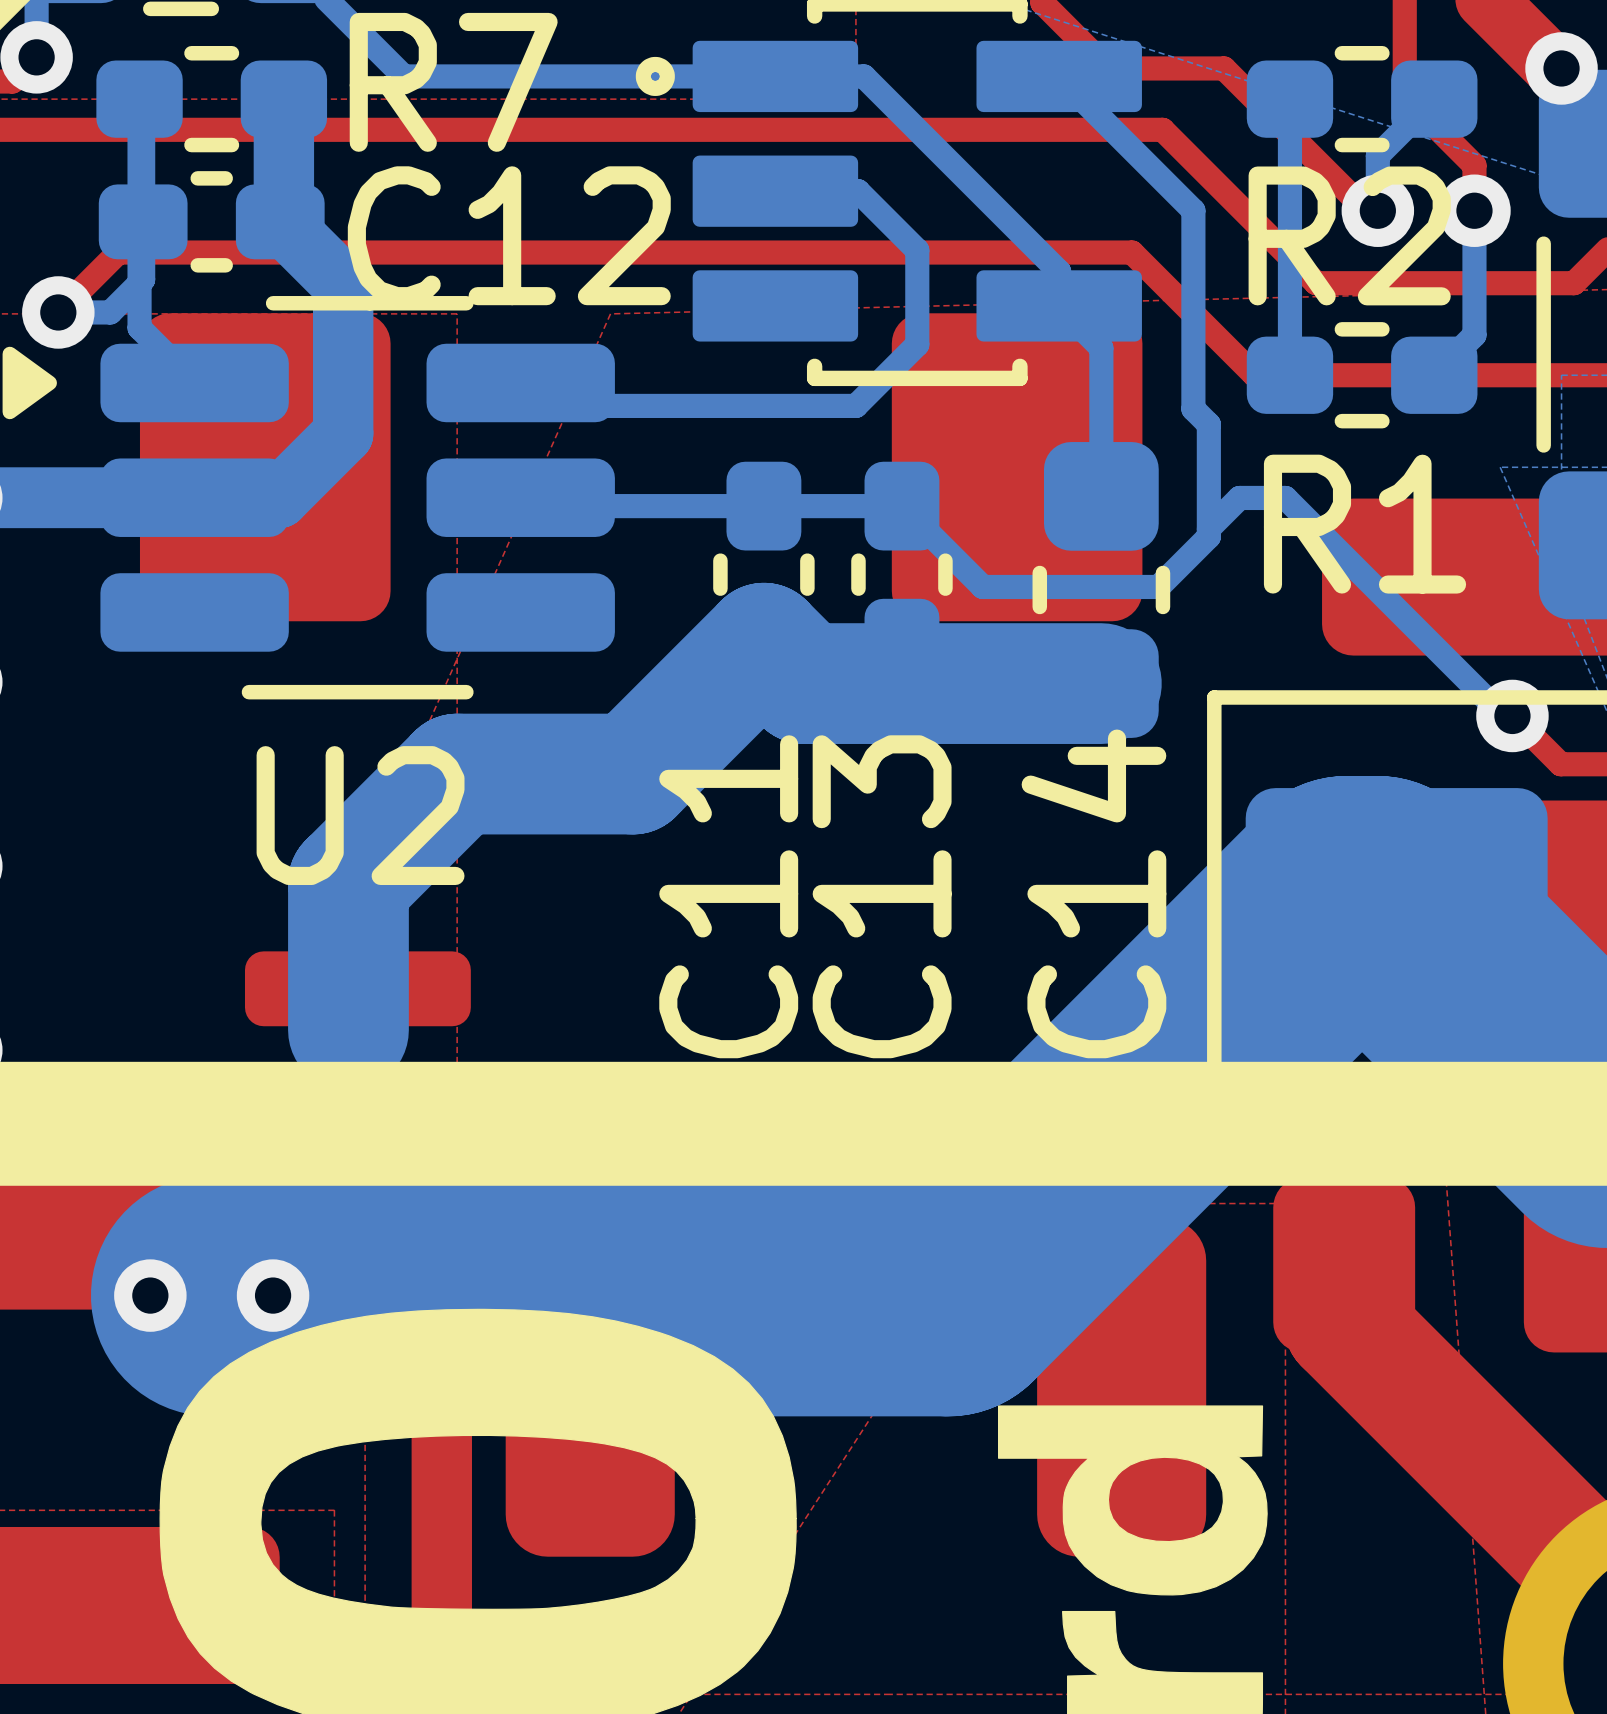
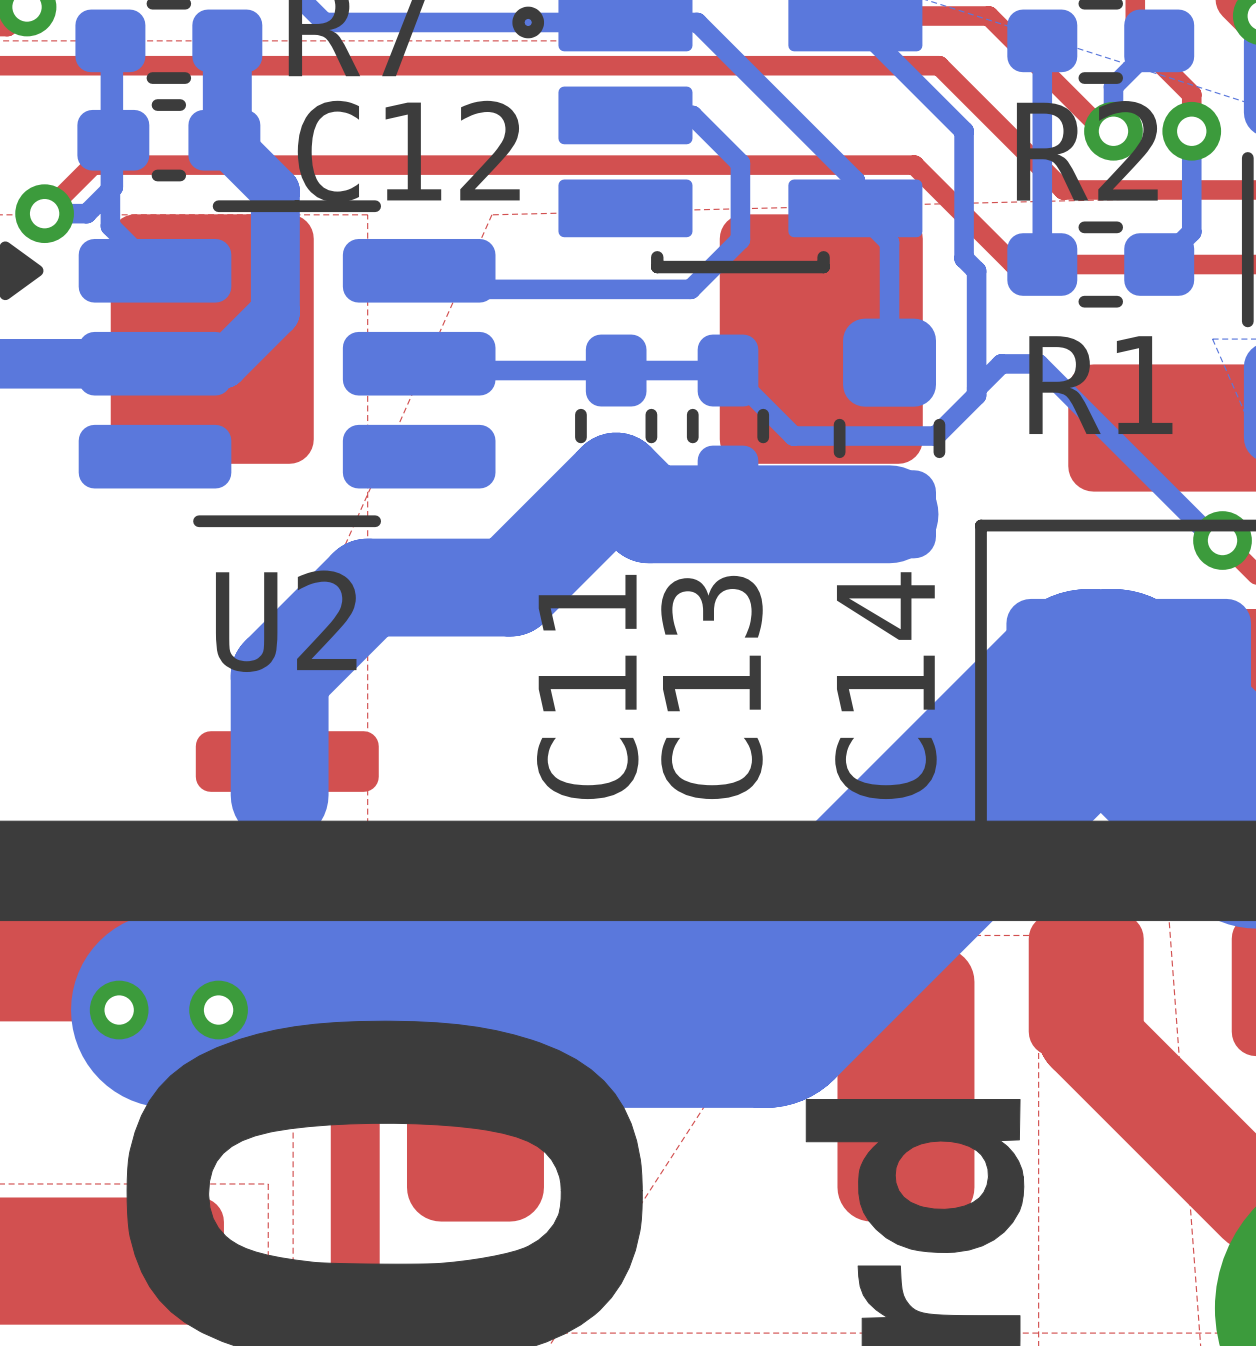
bottom track: (1193, 367) (1193, 408) (1208, 424) -> (964, 258) (976, 271) (976, 304)

